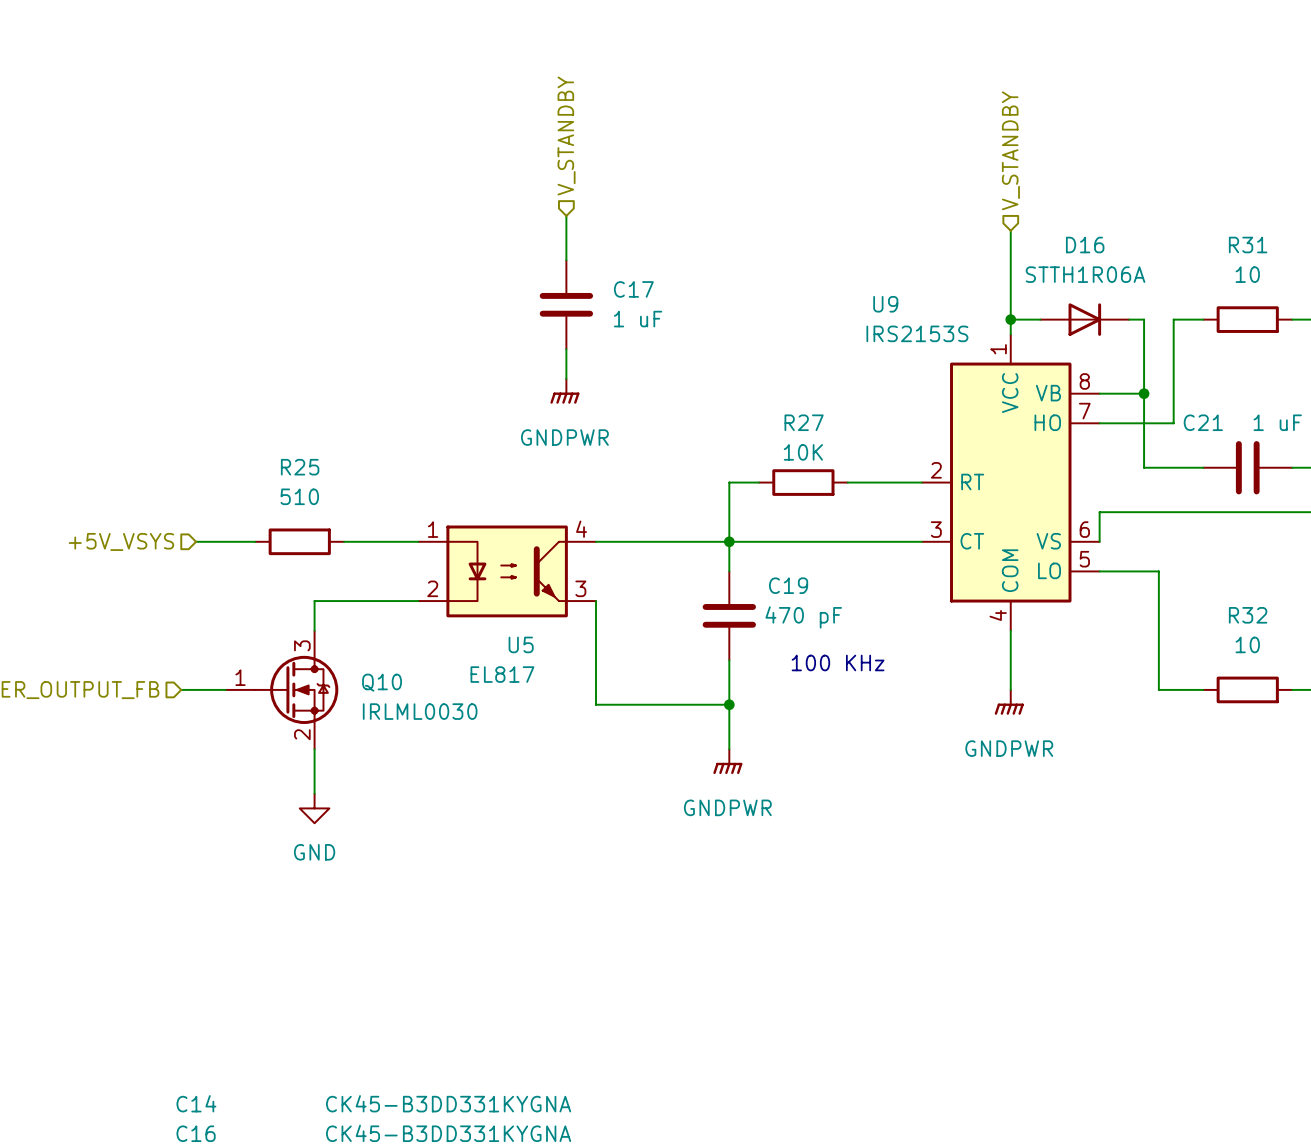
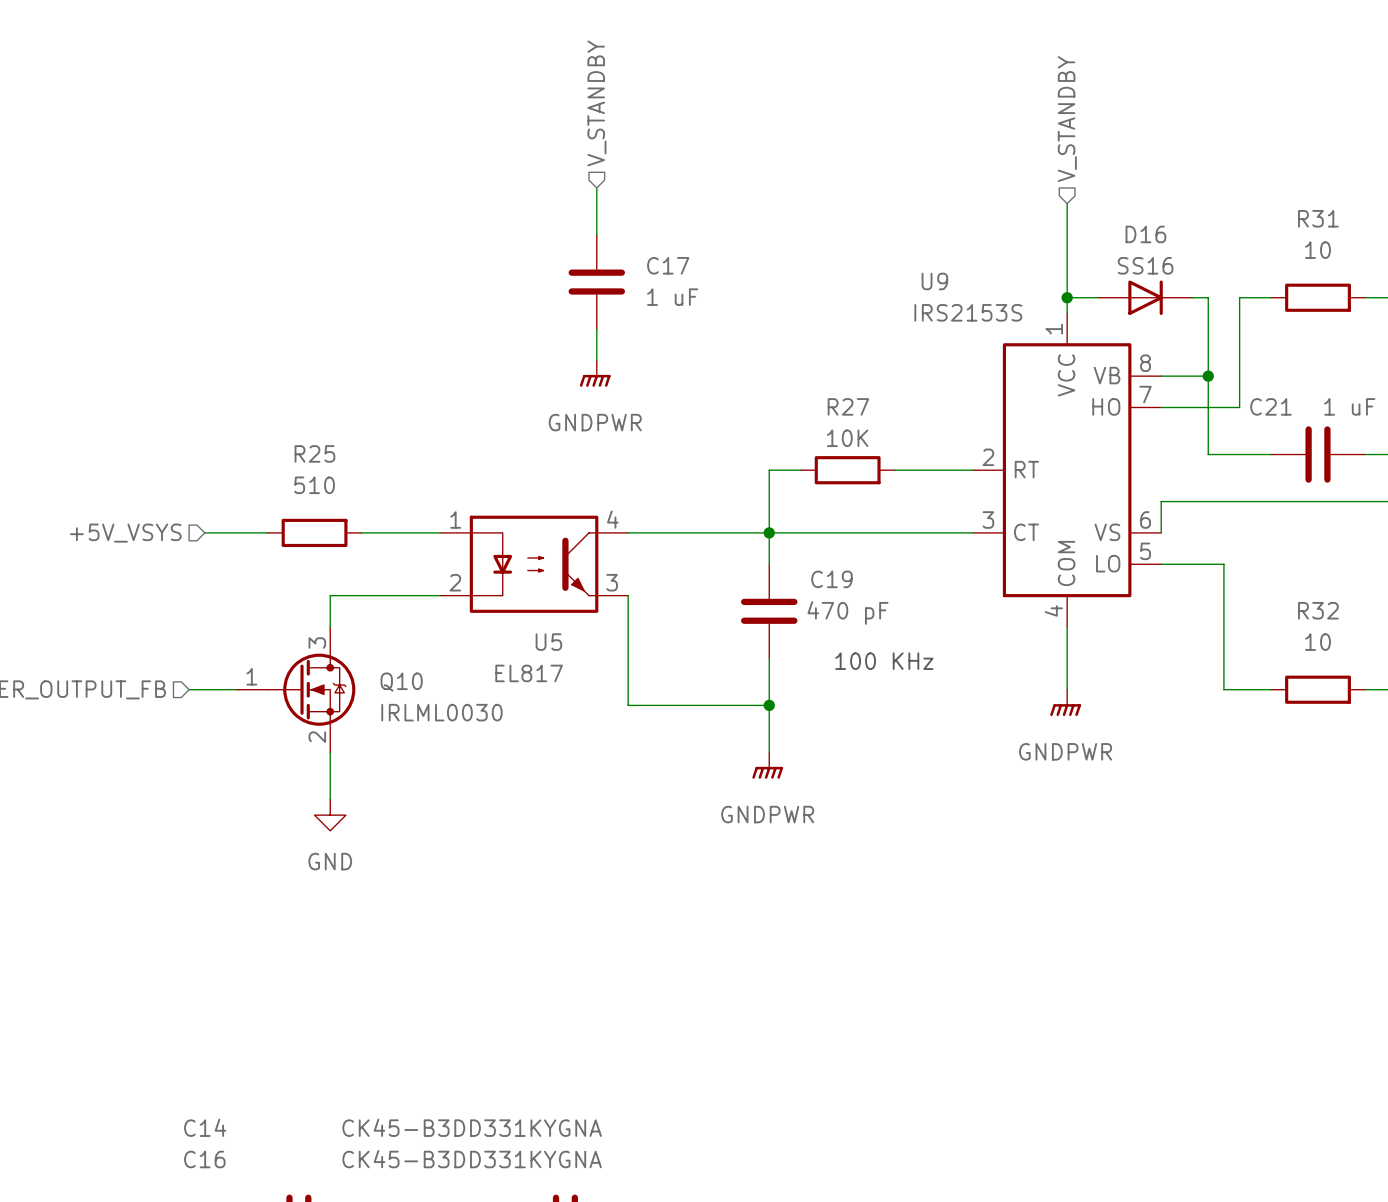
D16 name position: D16 (1085, 245) -> D16 (1145, 234)
D16 value: STTH1R06A (1085, 274) -> SS16 (1145, 265)

